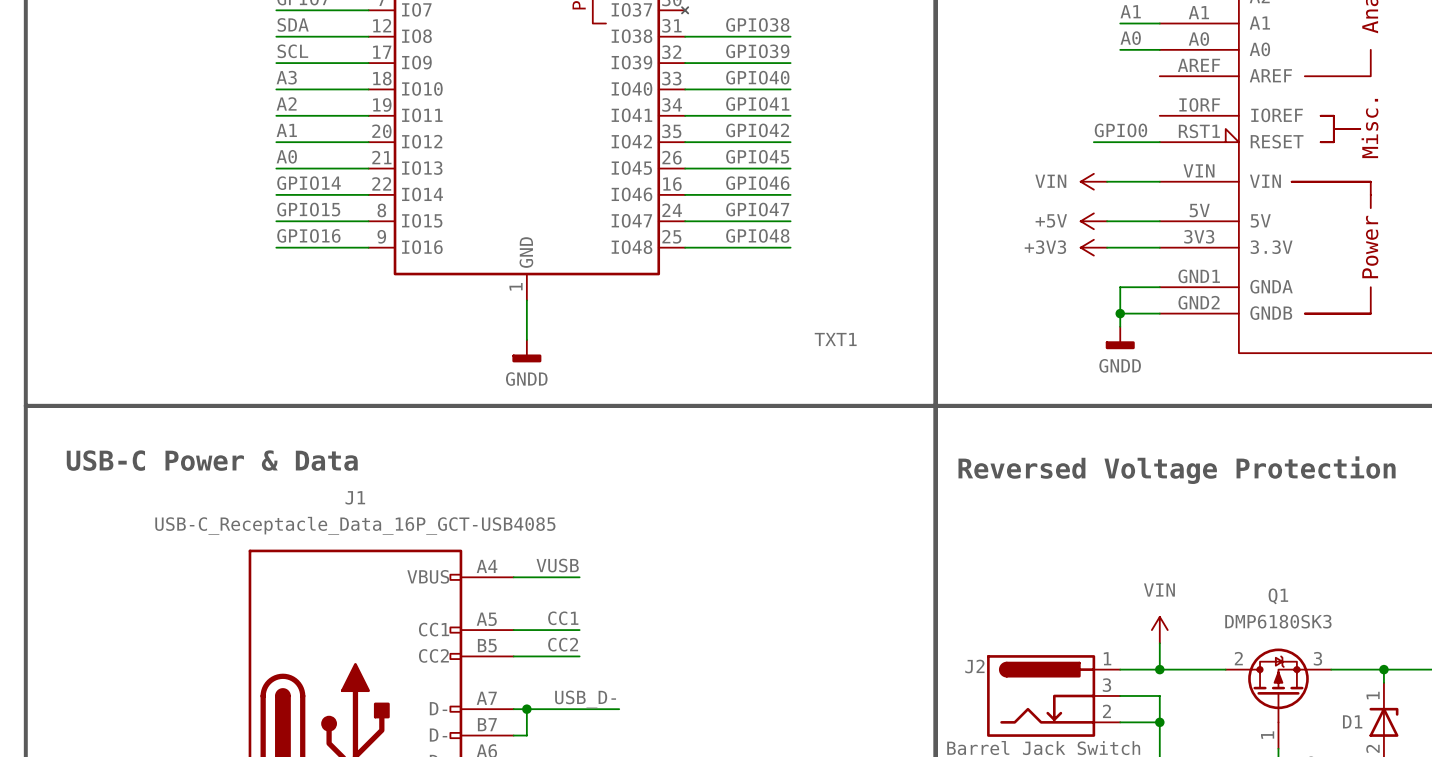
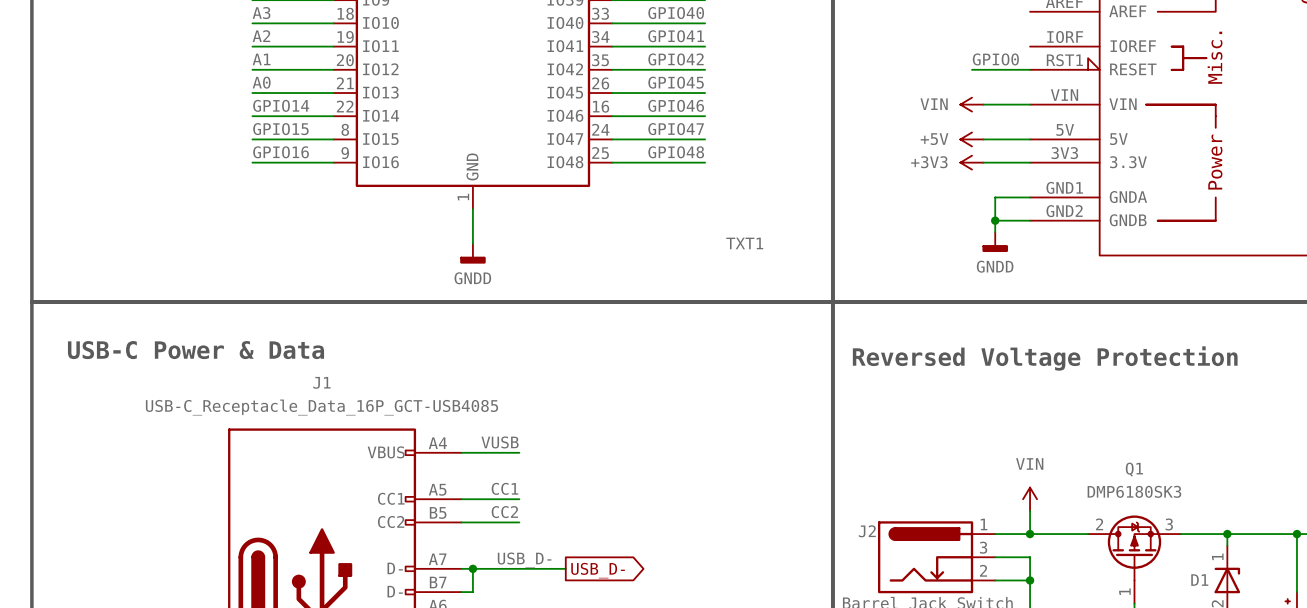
wire: none -> (554, 568) (565, 568)
global label: none -> USB_D- (598, 570)

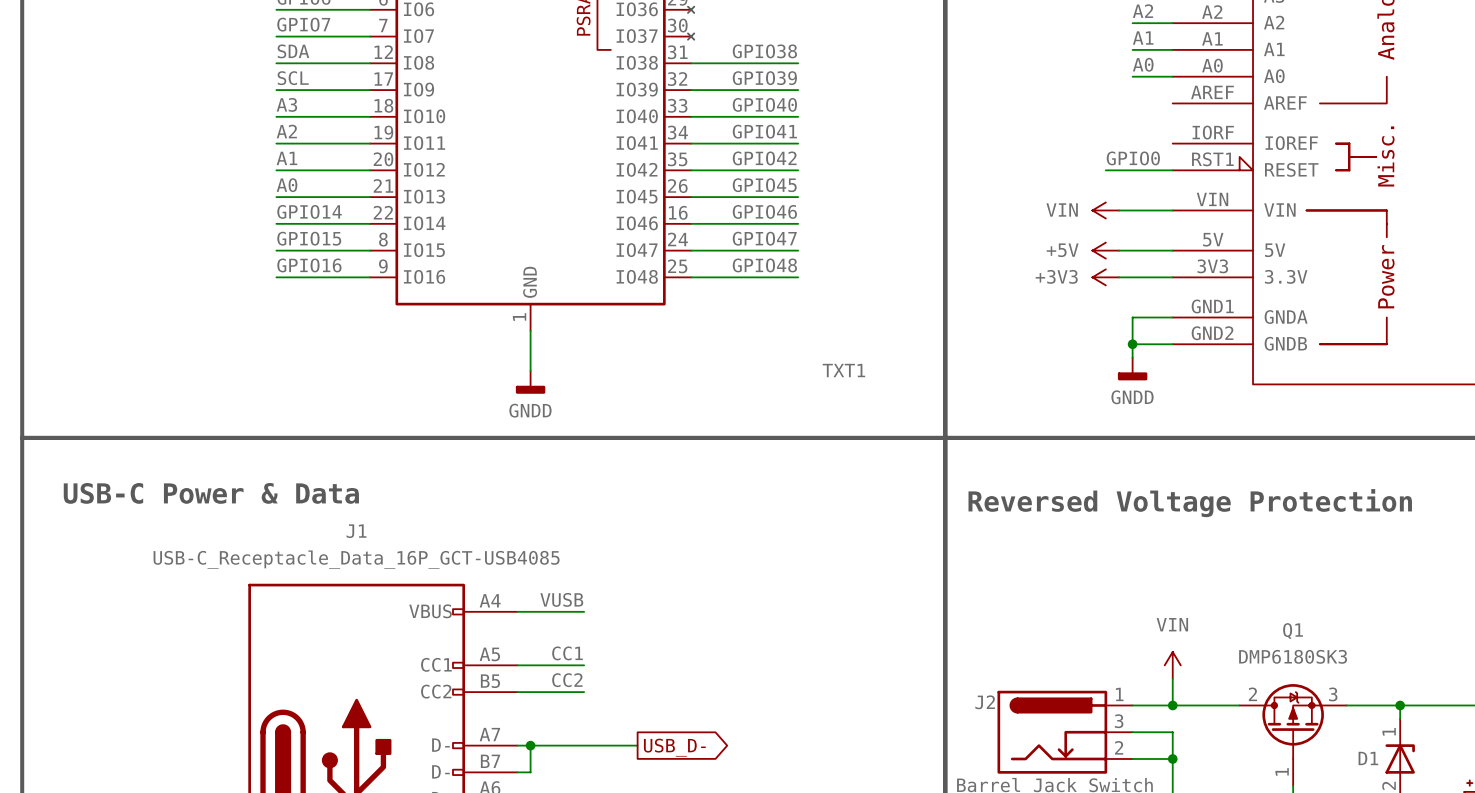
label: USB_D- (524, 560) -> none

